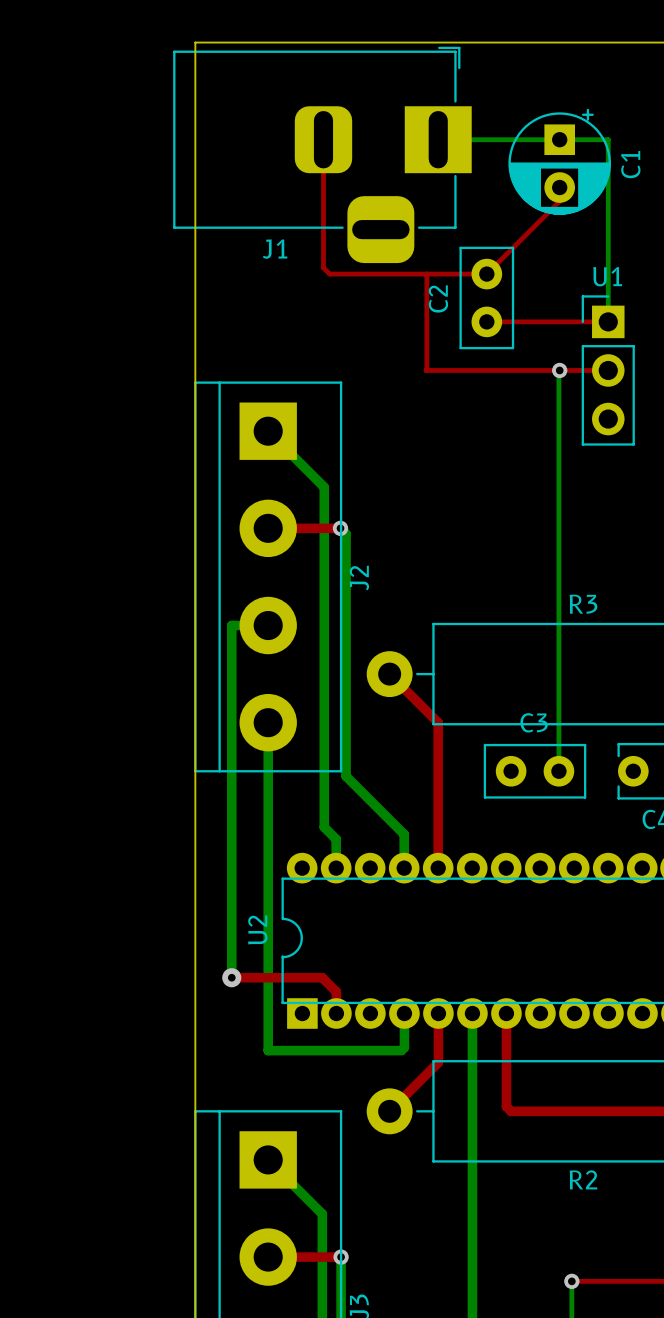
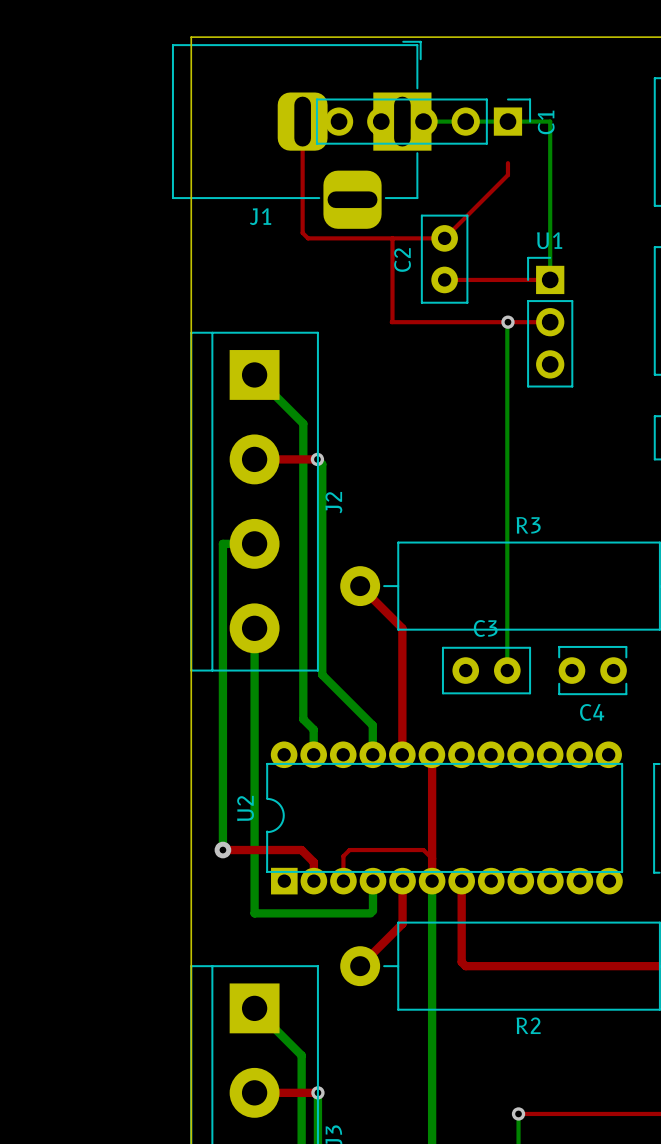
C1 footprint: [508, 108, 611, 215] -> [315, 98, 532, 145]
C1 name position: C1 (630, 164) -> C1 (546, 122)
top track: none -> (432, 754) (432, 881)
top track: none -> (432, 858) (423, 850) (349, 850) (343, 856) (343, 881)

